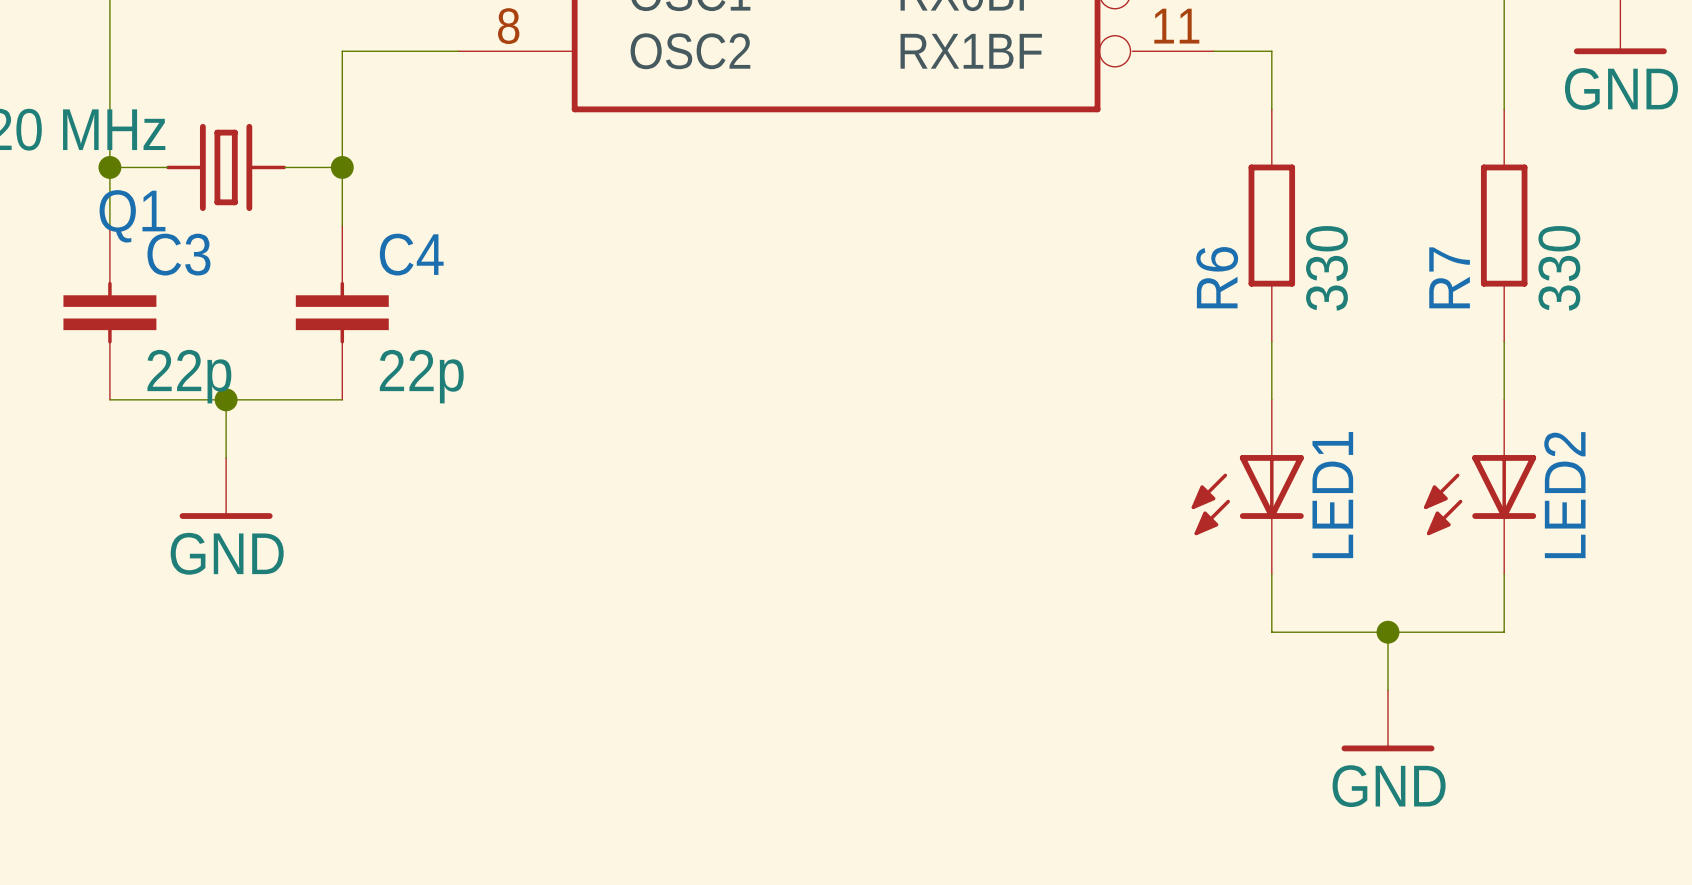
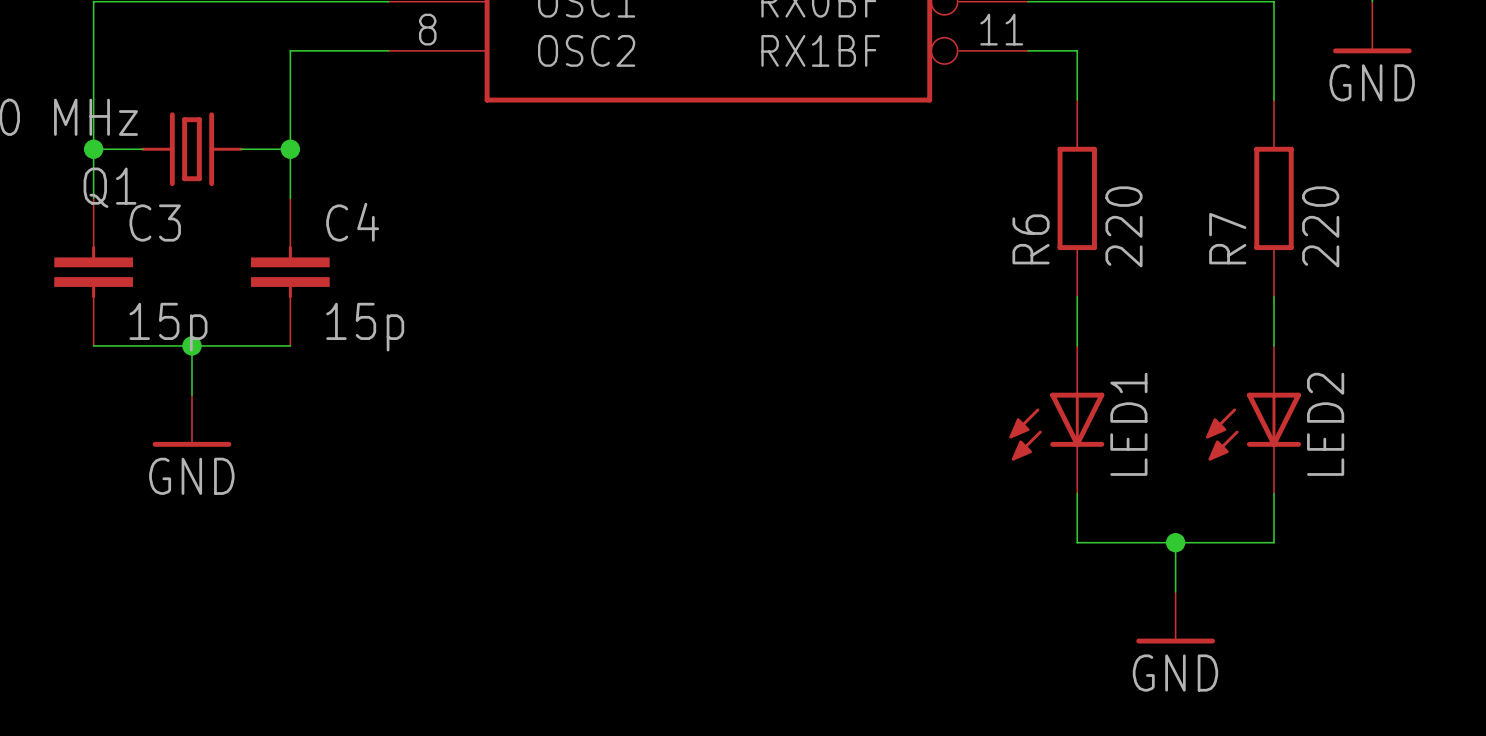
R6 value: 330 (1326, 268) -> 220 (1123, 226)
R7 value: 330 (1559, 268) -> 220 (1320, 226)
C3 value: 22p (189, 376) -> 15p (168, 327)
C4 value: 22p (421, 376) -> 15p (365, 327)

